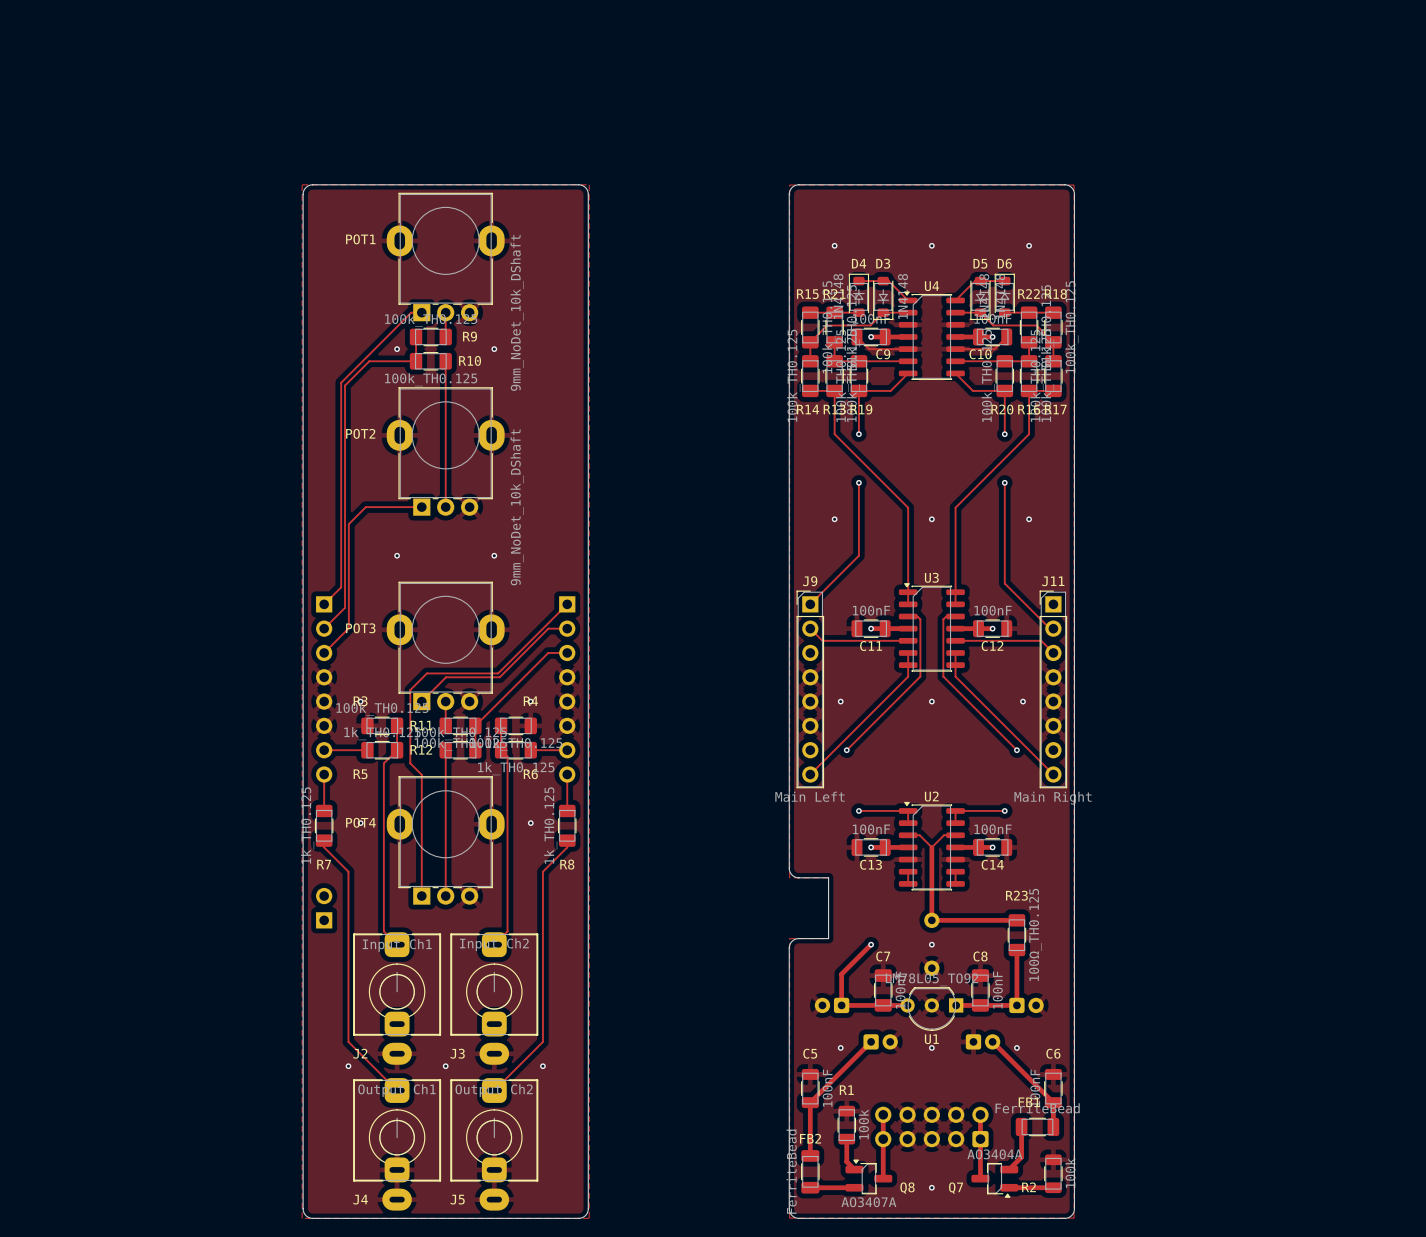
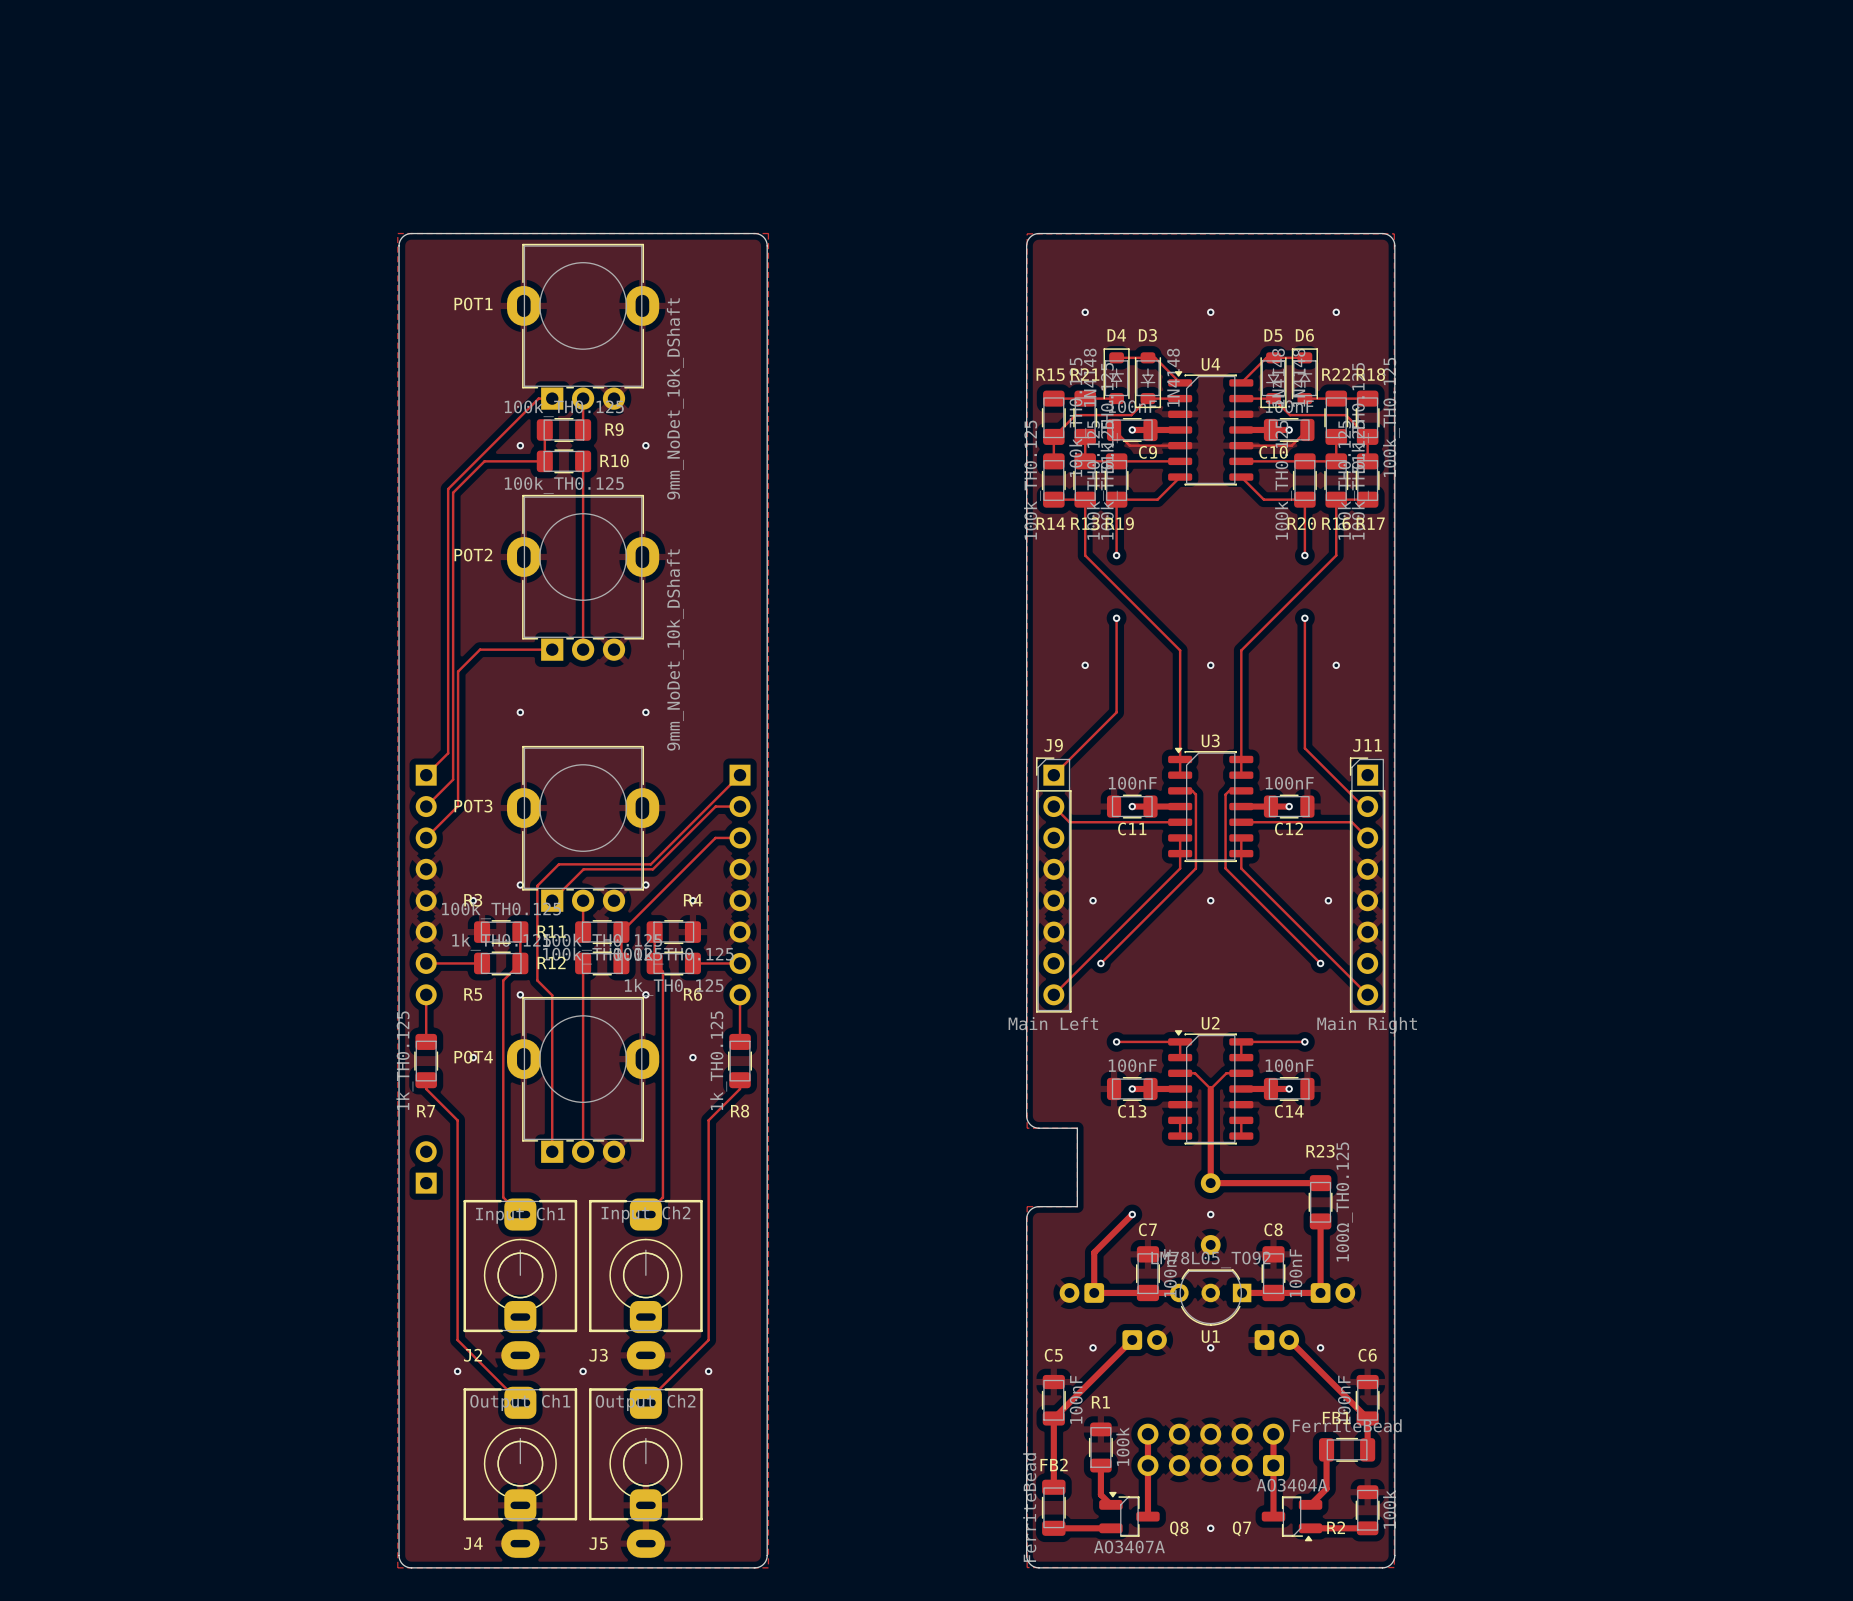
via: none -> (520, 885)
via: none -> (645, 885)
via: none -> (520, 994)
via: none -> (645, 994)

